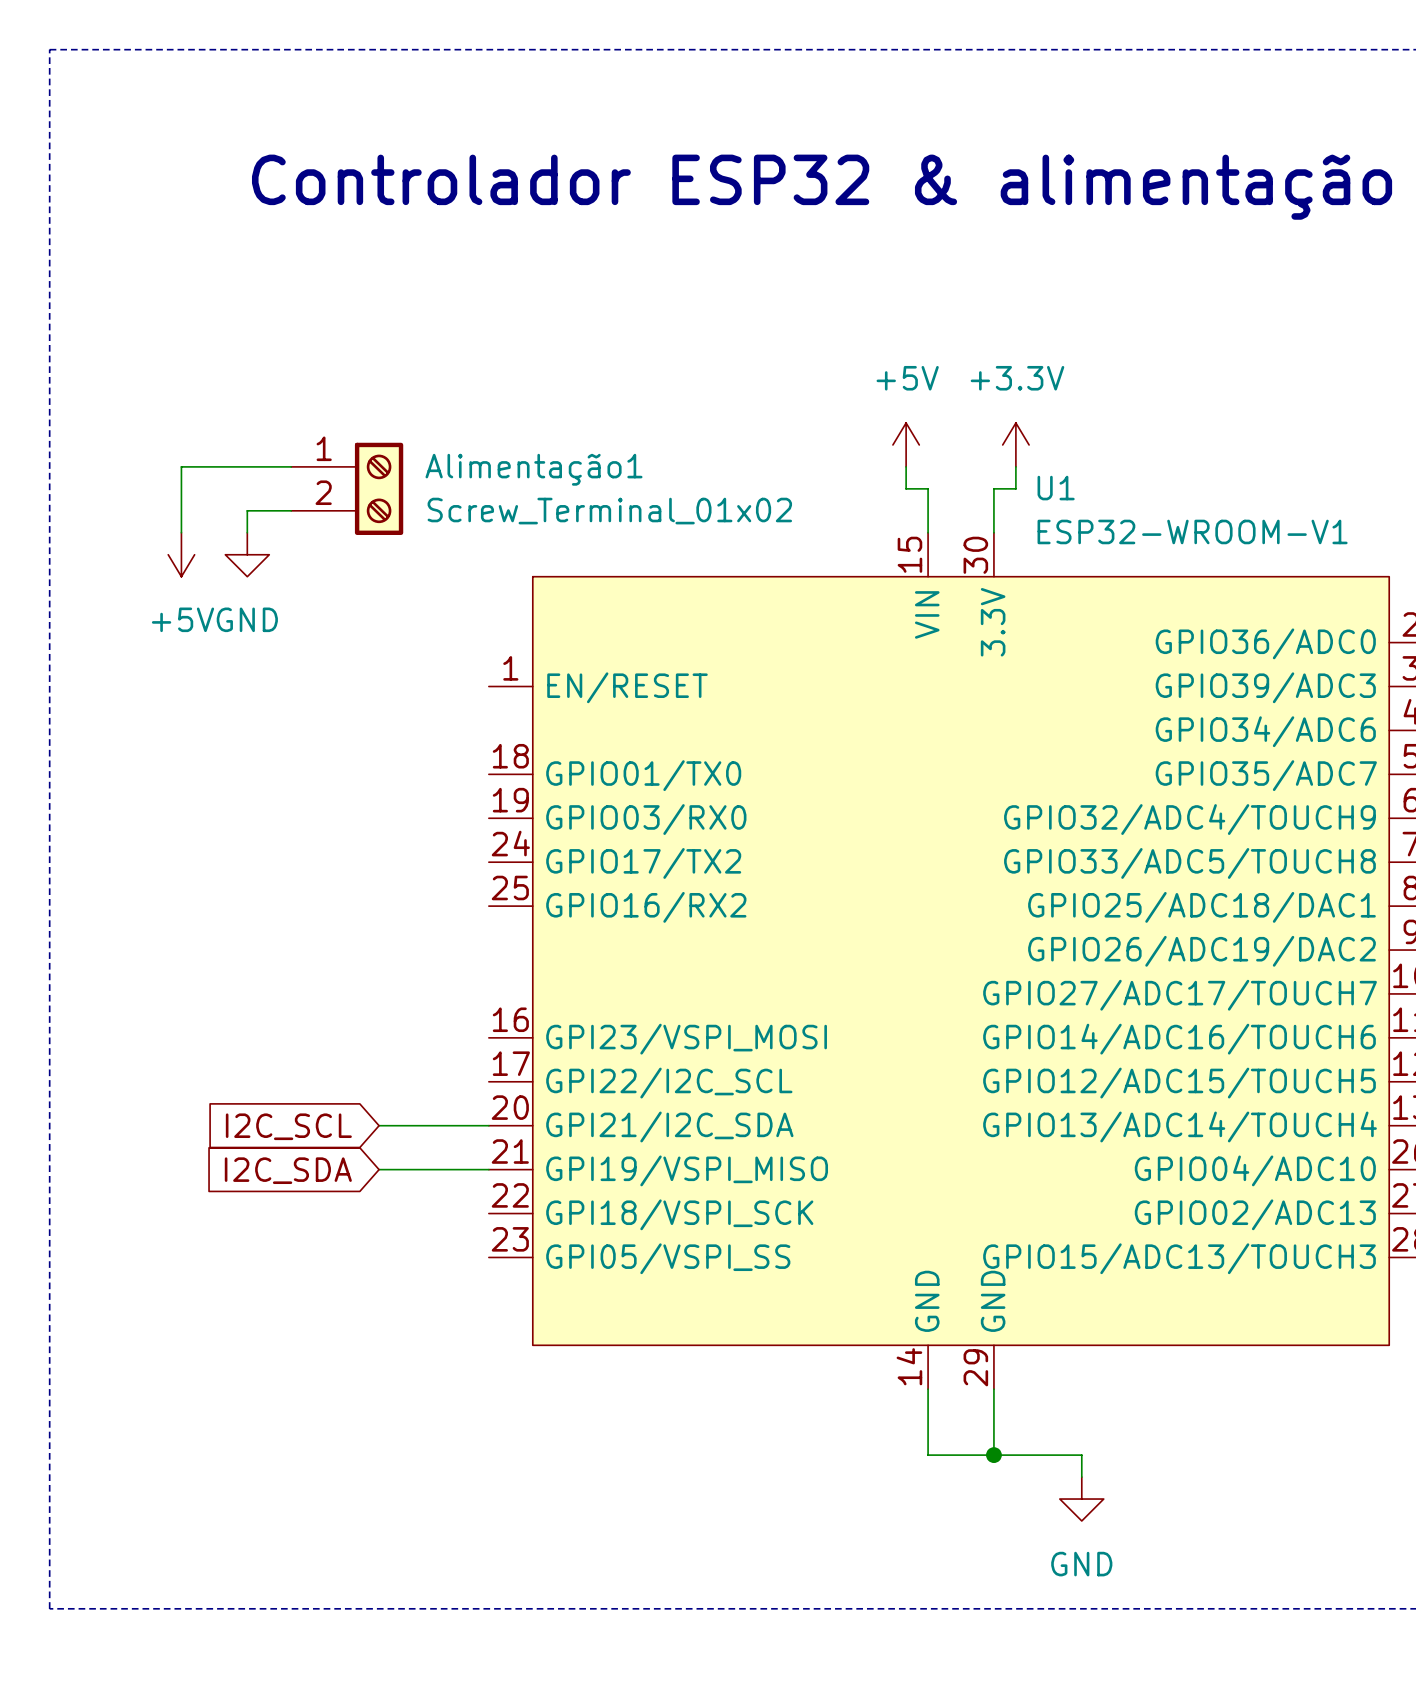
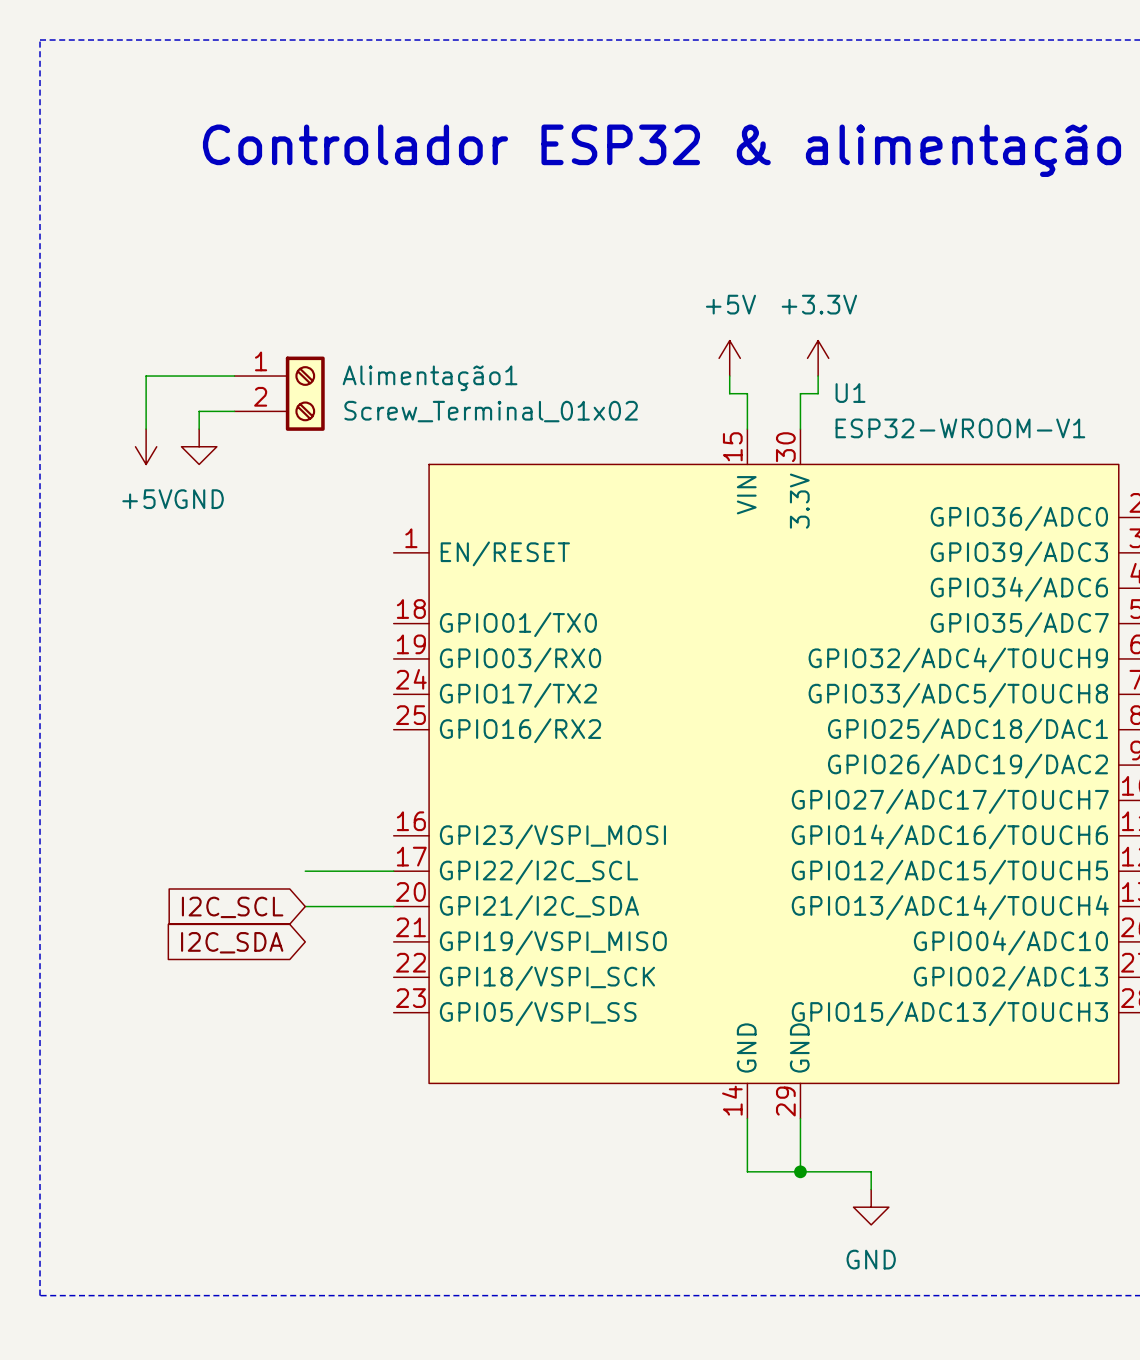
wire: (379, 1169) (488, 1169) -> (305, 871) (393, 871)

